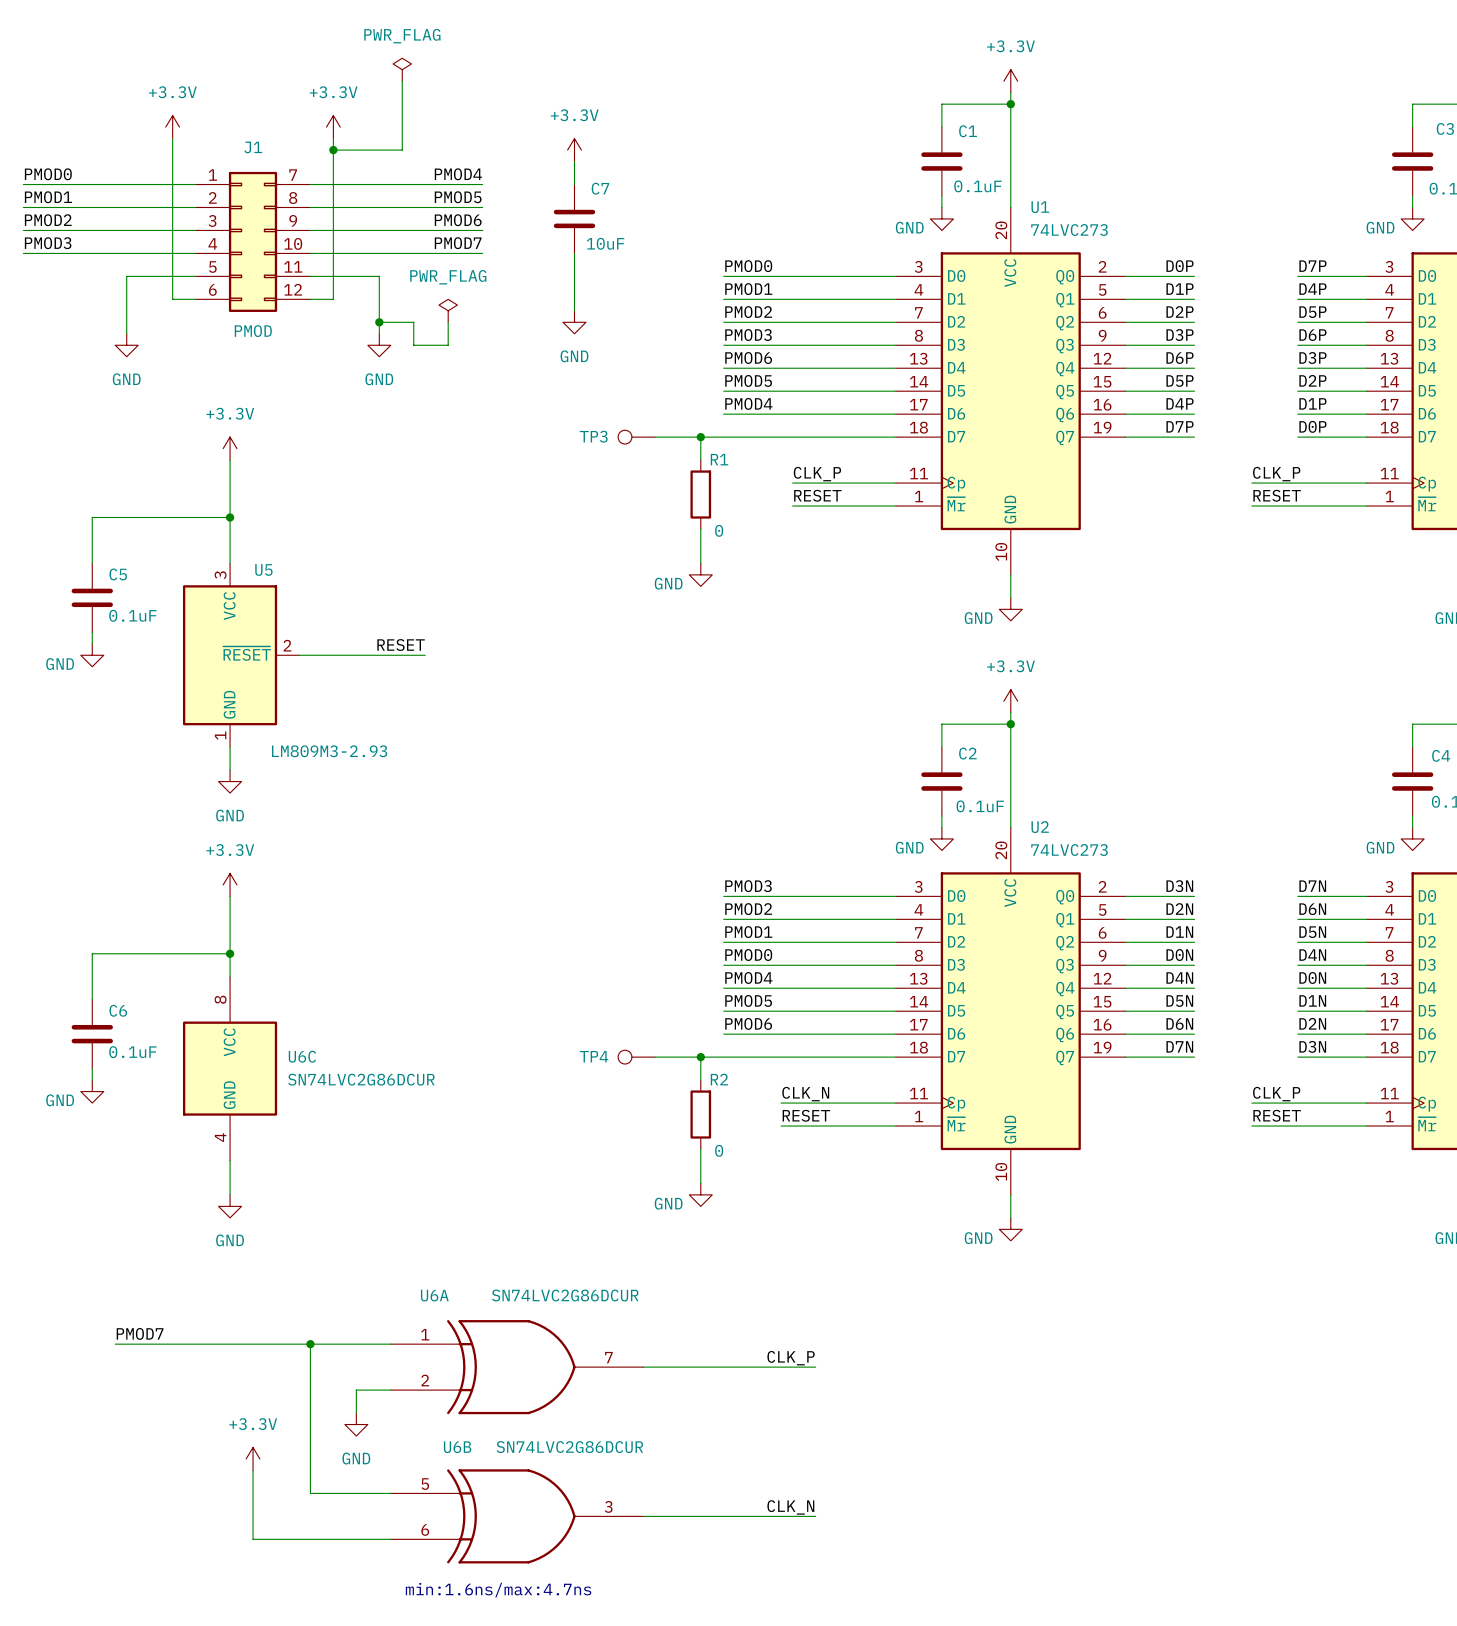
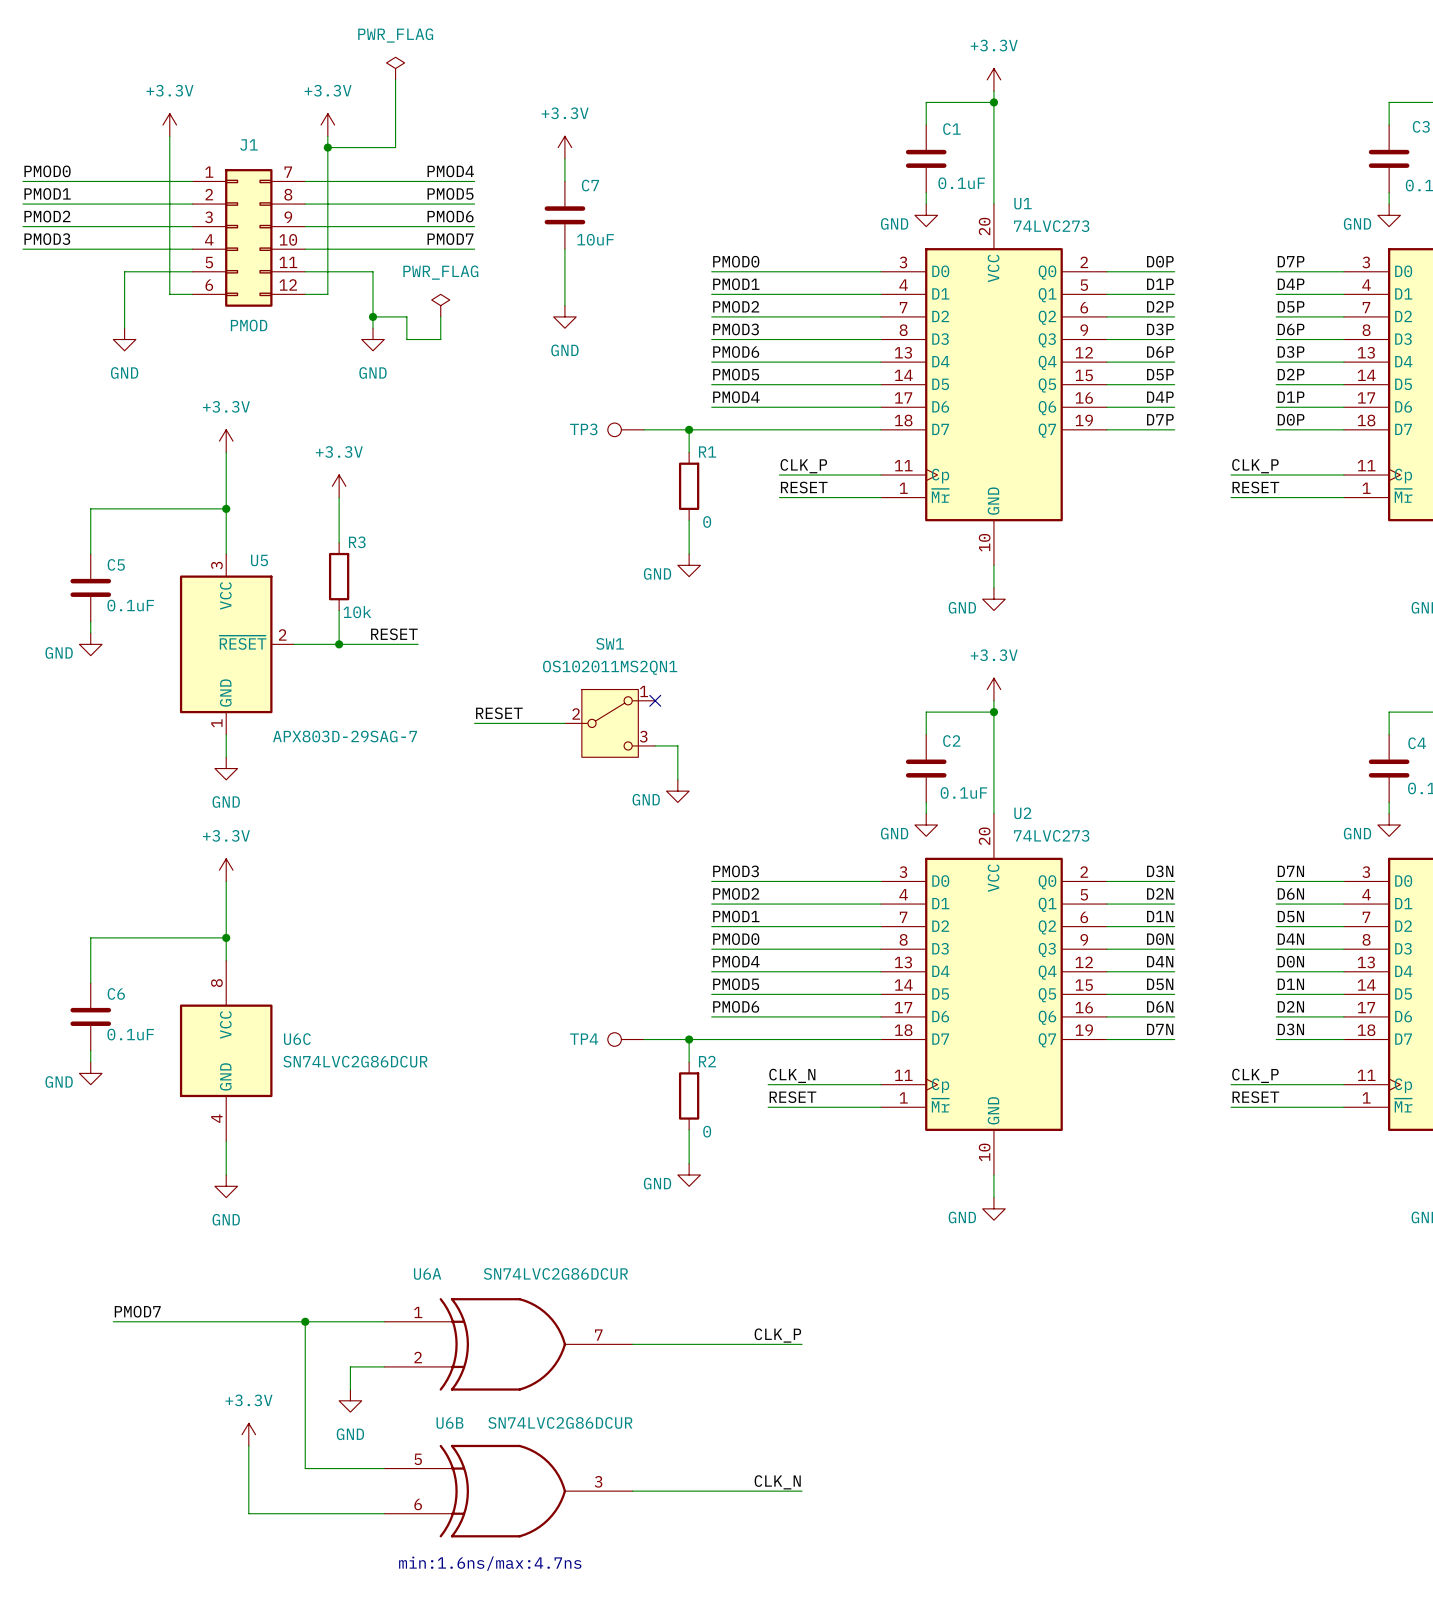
power symbol: none -> +3.3V (339, 486)
wire: none -> (339, 497) (339, 542)
R3: none -> 10k (339, 576)
wire: none -> (339, 610) (339, 644)
junction: none -> (339, 644)
no-connect mark: none -> (655, 700)
label: none -> RESET (499, 713)
wire: none -> (474, 723) (564, 723)
SW1: none -> OS102011MS2QN1 (610, 723)
U5 value: LM809M3-2.93 (329, 751) -> APX803D-29SAG-7 (345, 736)
wire: none -> (655, 745) (677, 745) (677, 779)
power symbol: none -> GND (677, 791)

